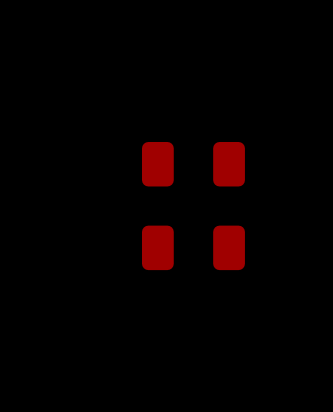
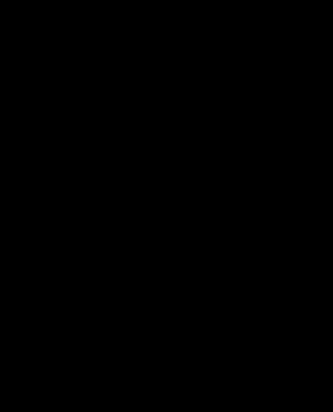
part: (193, 164) -> none
part: (193, 247) -> none

